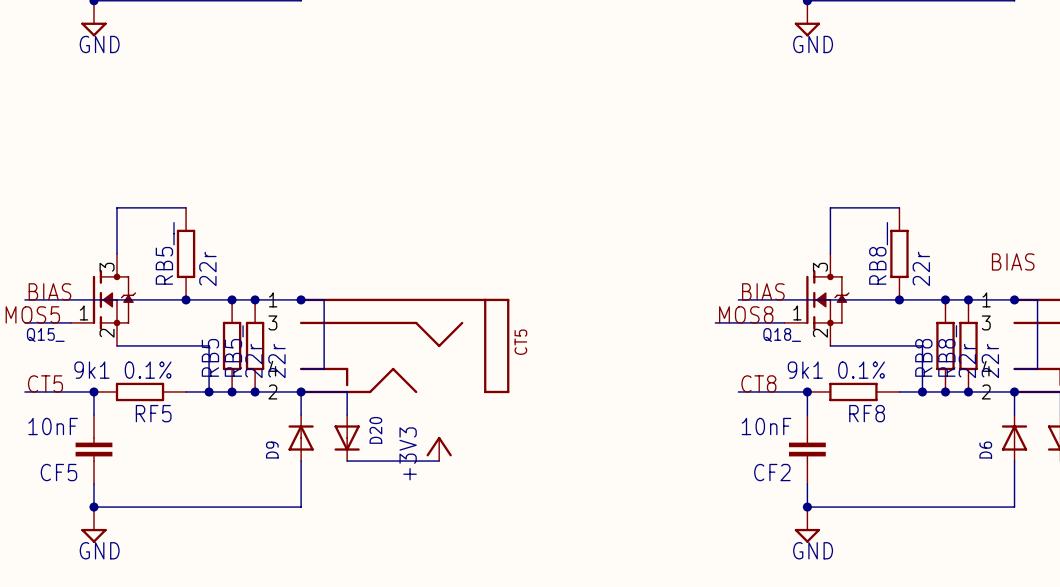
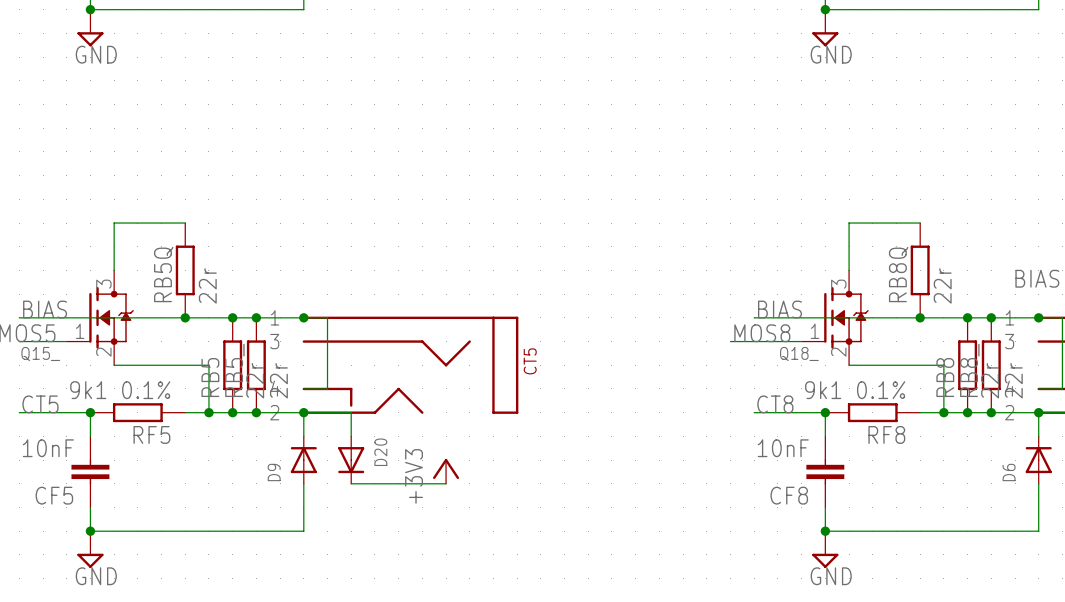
RB5__ name: RB5__ (165, 253) -> RB5Q (163, 274)
RB8__ name: RB8__ (878, 253) -> RB8Q (898, 274)
CF2 name: CF2 (772, 472) -> CF8 (789, 495)

